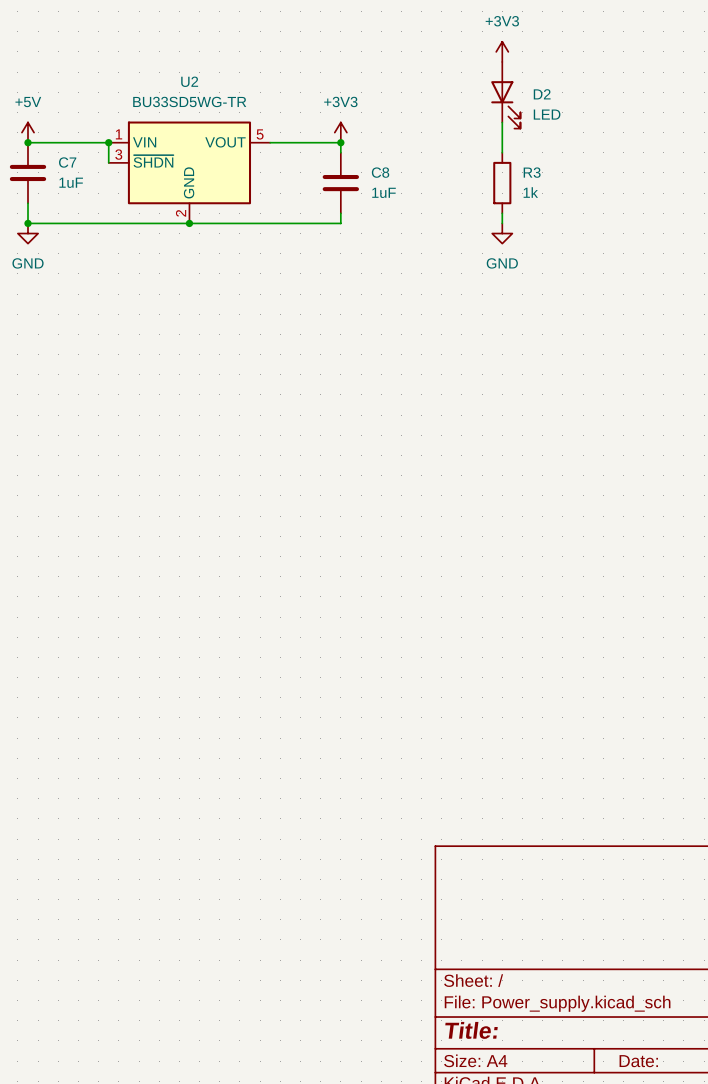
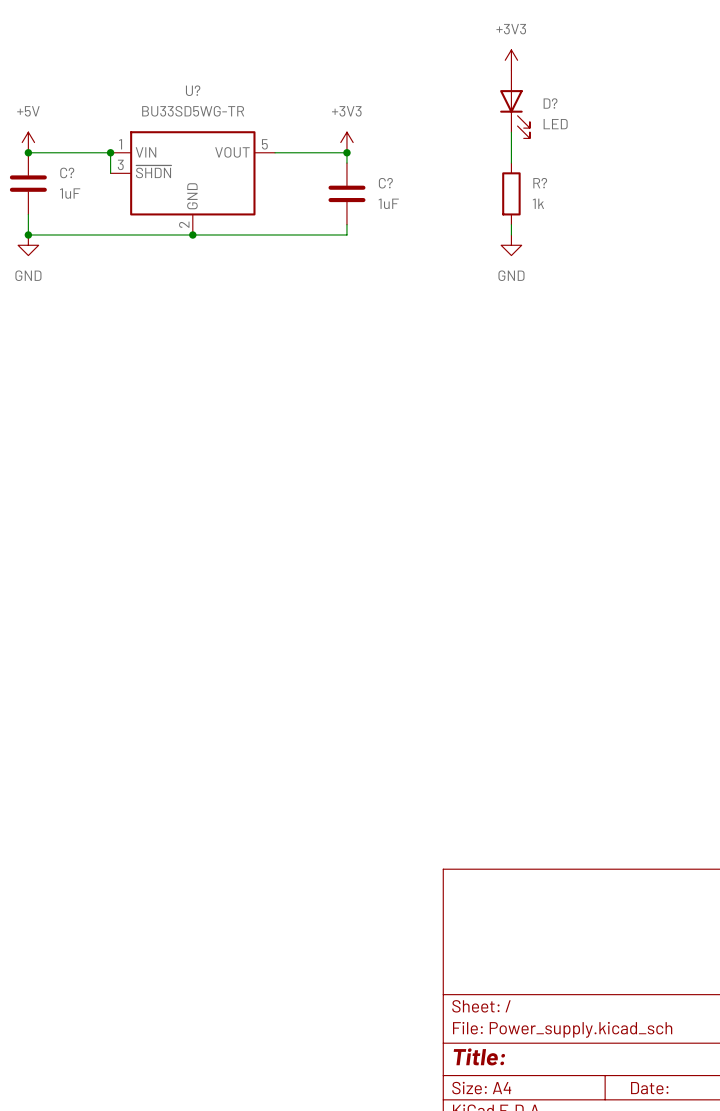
U2 name: U2 (189, 81) -> U? (193, 90)
D2 name: D2 (542, 94) -> D? (550, 103)
C7 name: C7 (67, 162) -> C? (67, 172)
C8 name: C8 (380, 172) -> C? (385, 183)
R3 name: R3 (532, 172) -> R? (540, 183)

